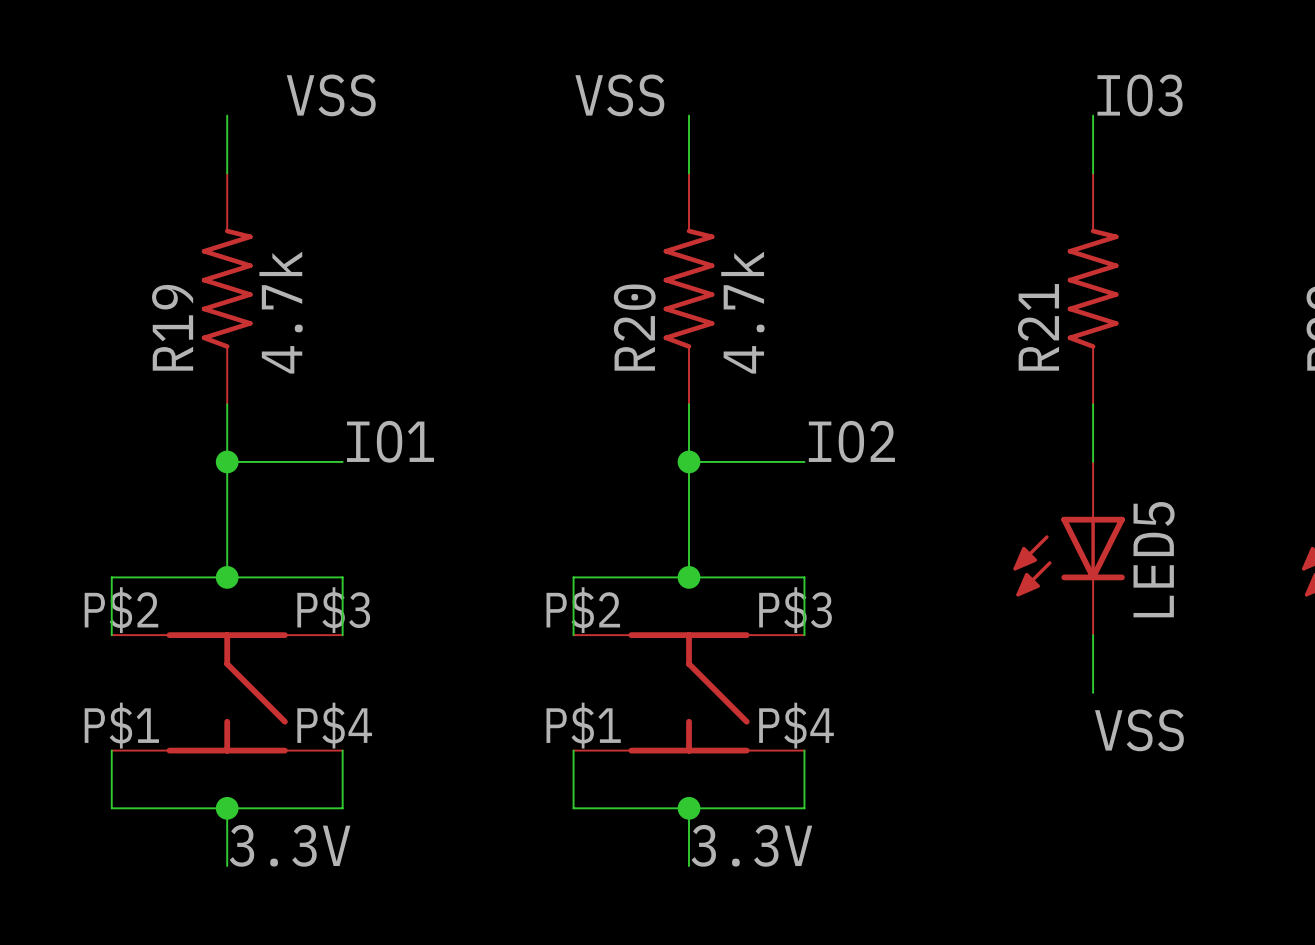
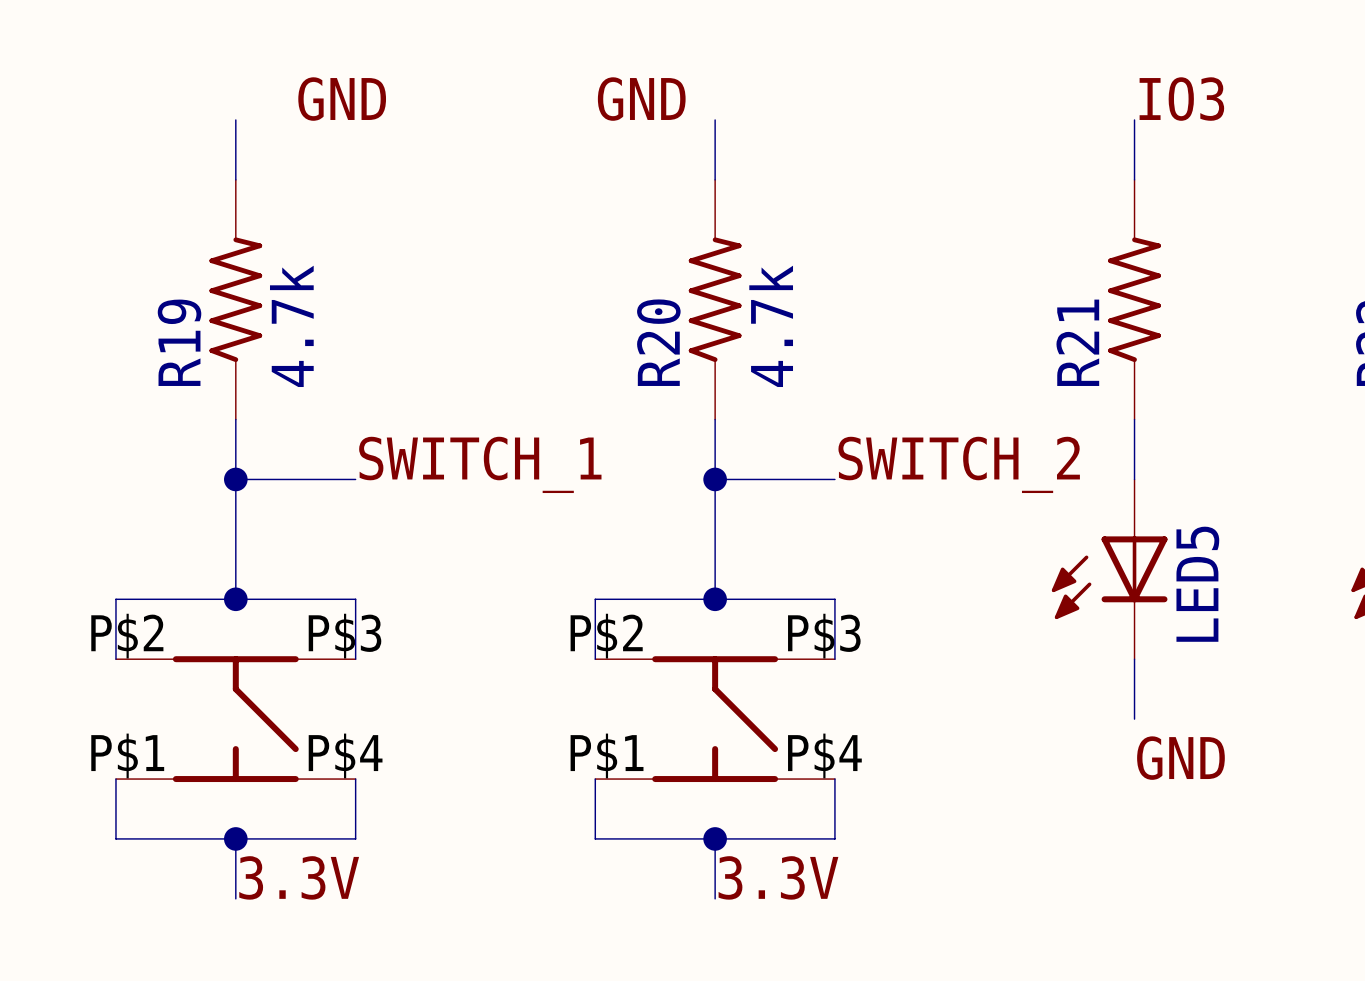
label: VSS (331, 95) -> GND (342, 99)
label: VSS (619, 95) -> GND (641, 99)
label: IO1 (390, 441) -> SWITCH_1 (480, 464)
label: IO2 (851, 441) -> SWITCH_2 (959, 464)
label: VSS (1139, 730) -> GND (1180, 758)

